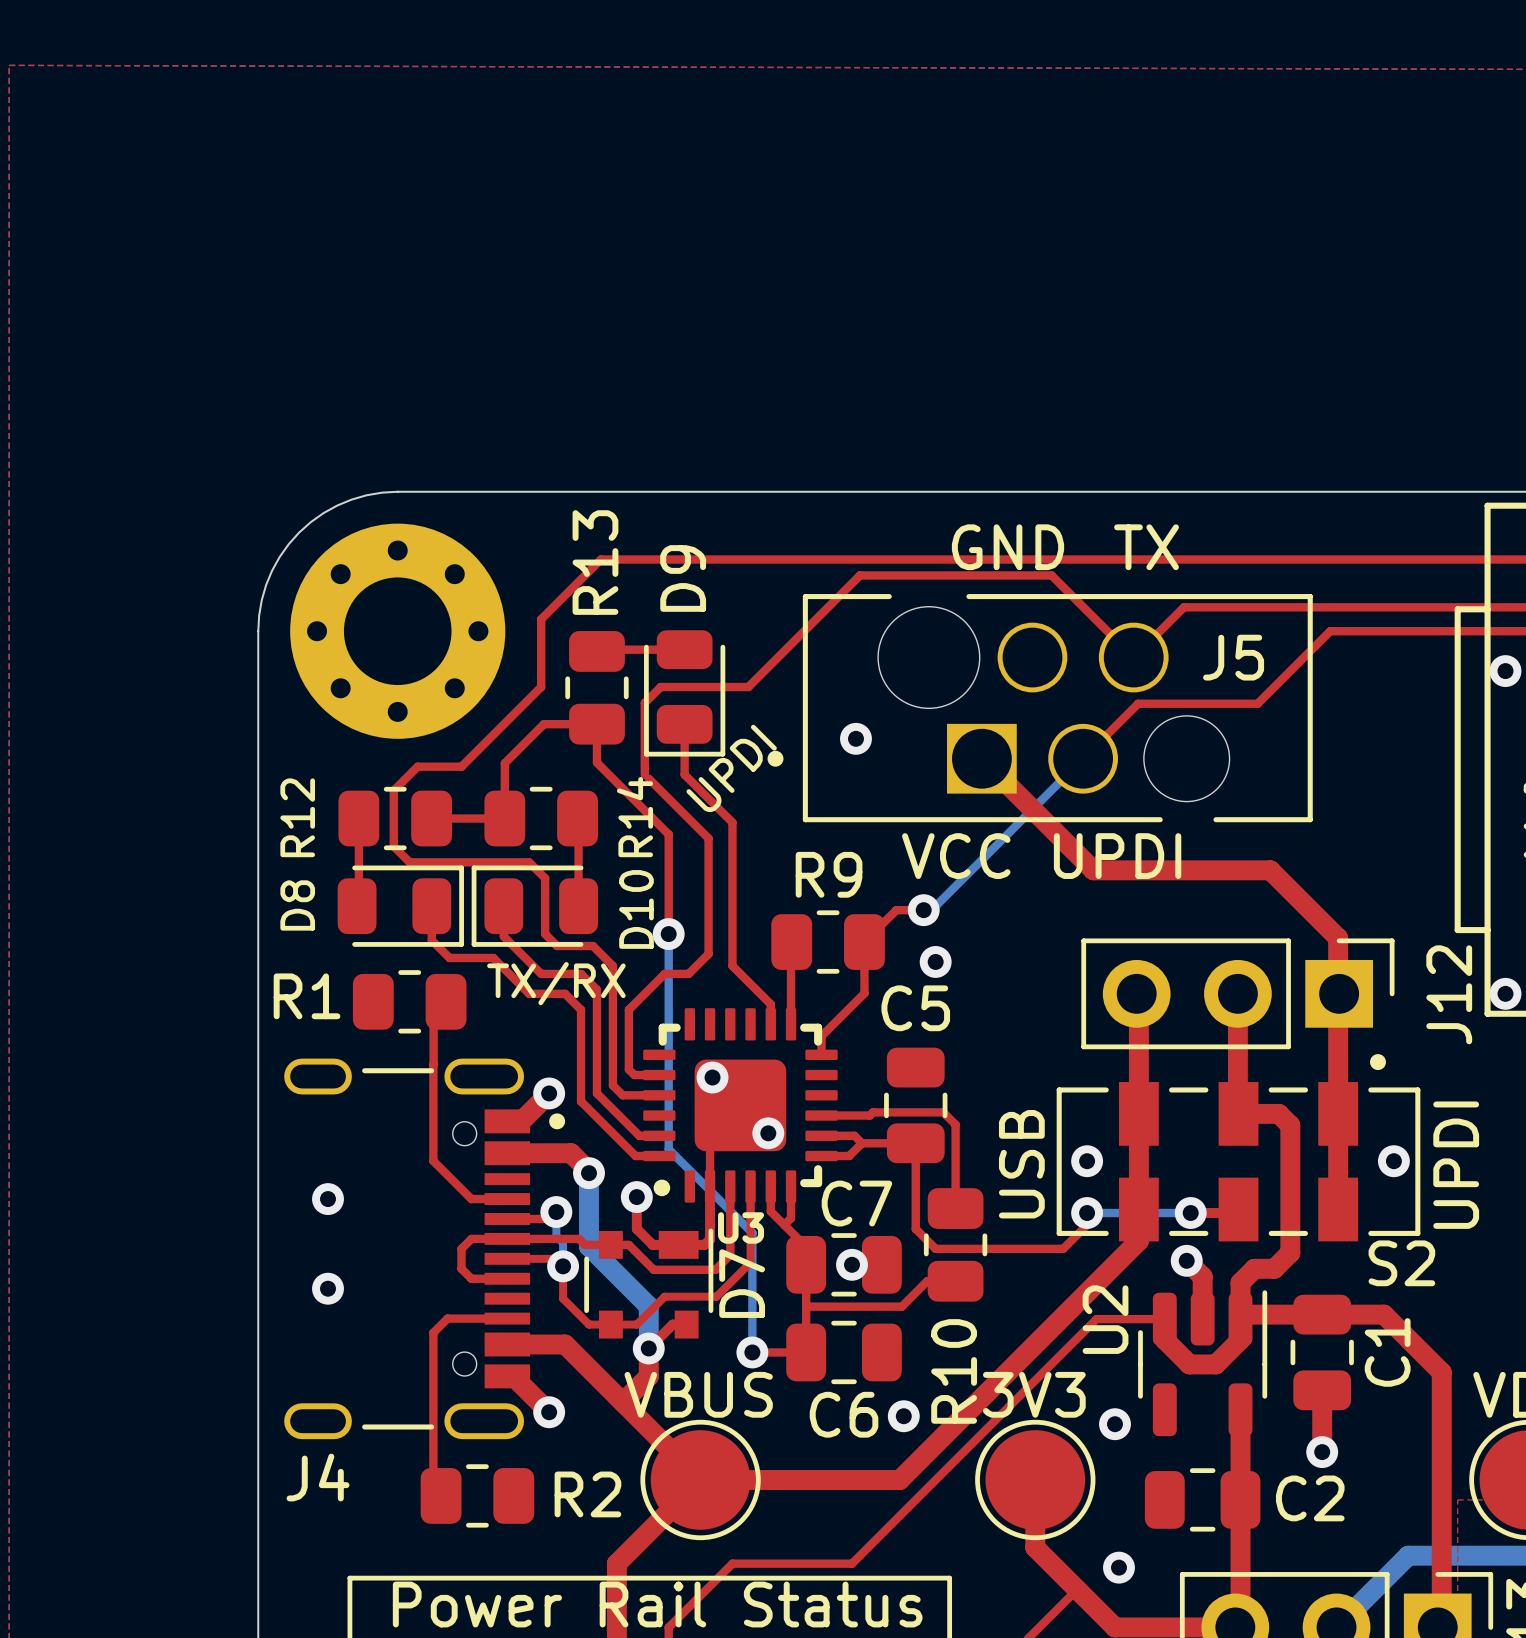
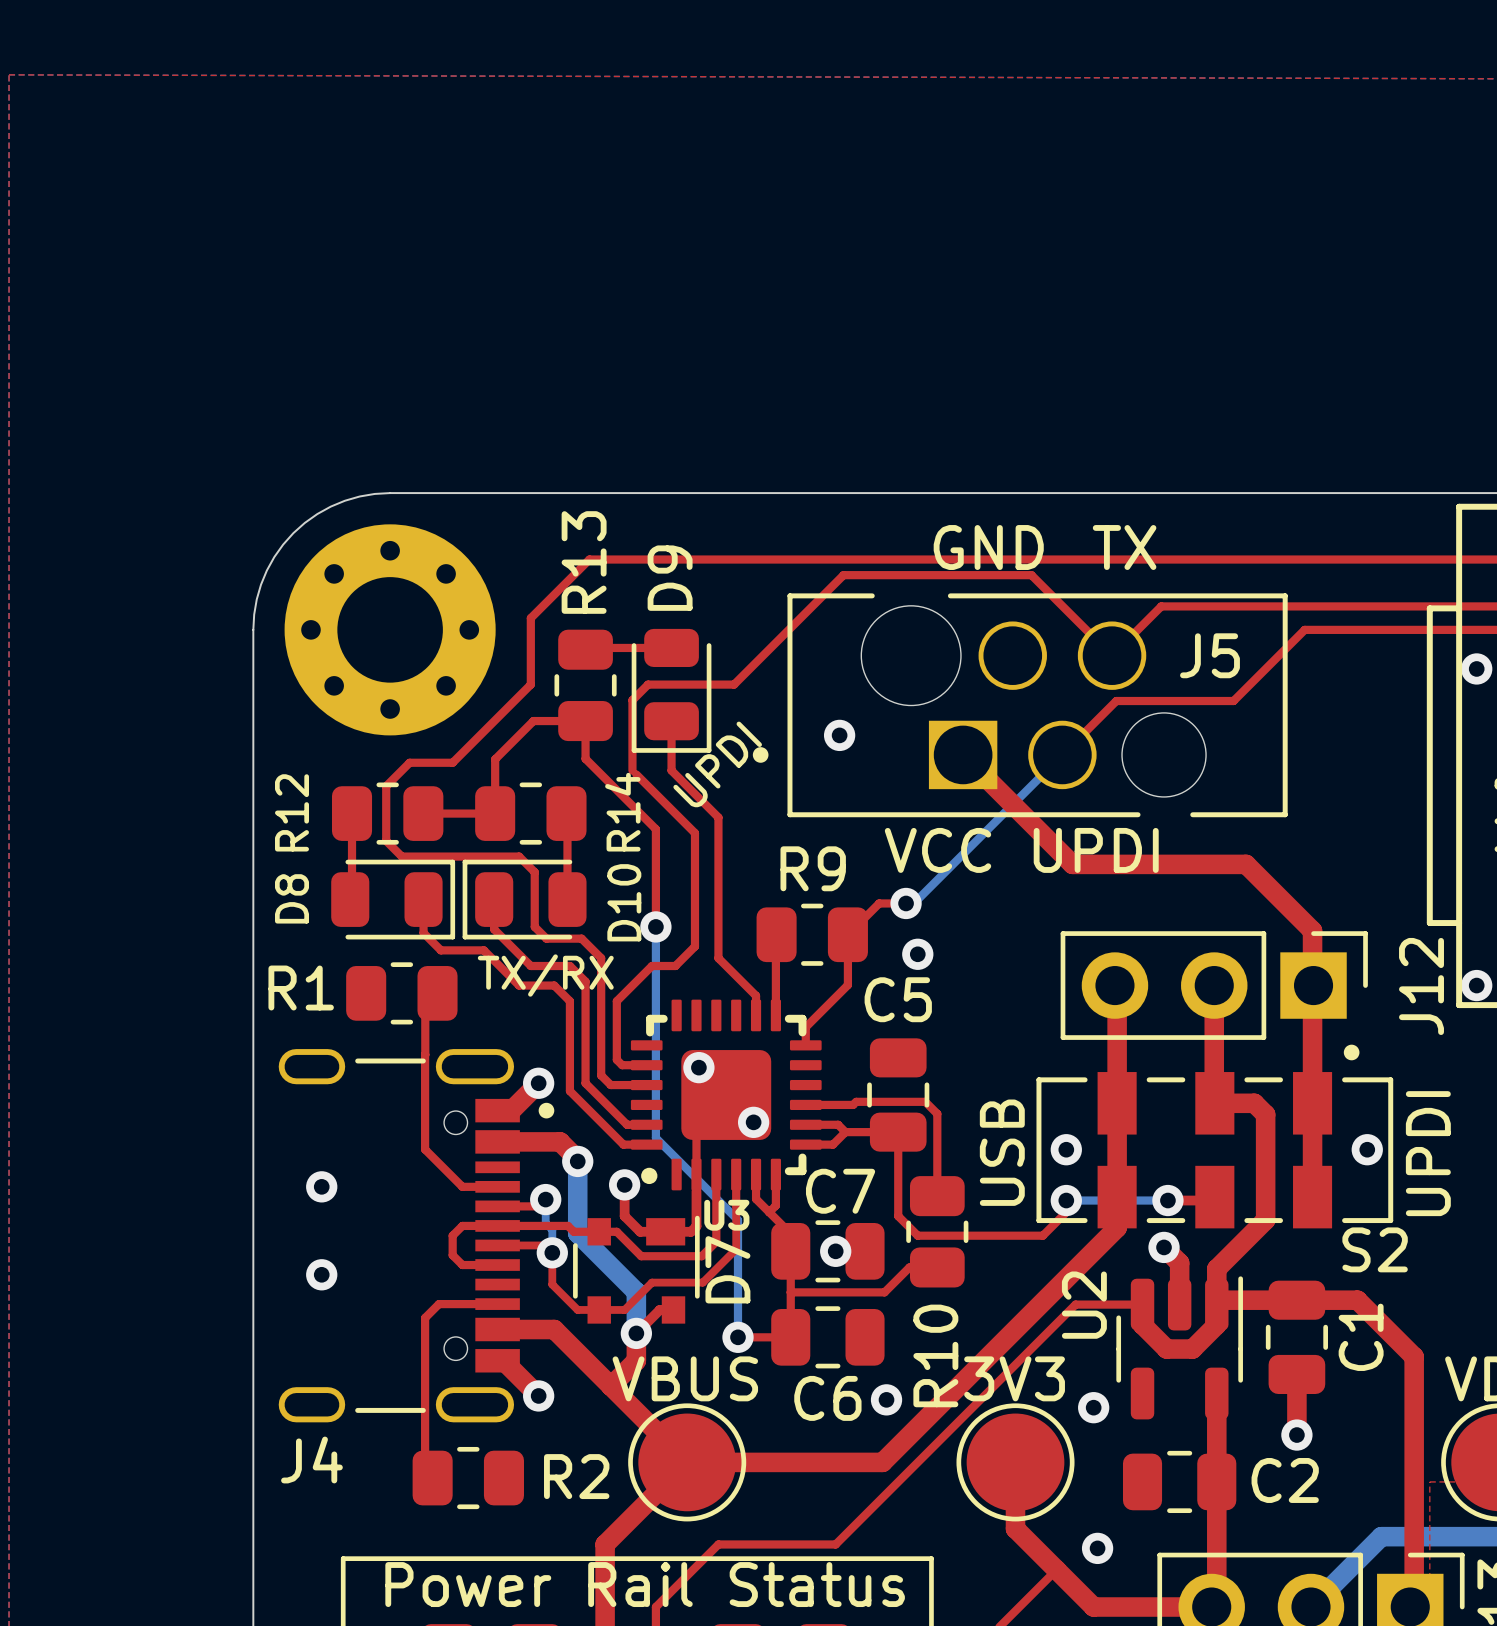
top track: (1290, 1232) (1290, 1252) (1274, 1268) (1254, 1268) -> (1265, 1220) (1230, 1255)

